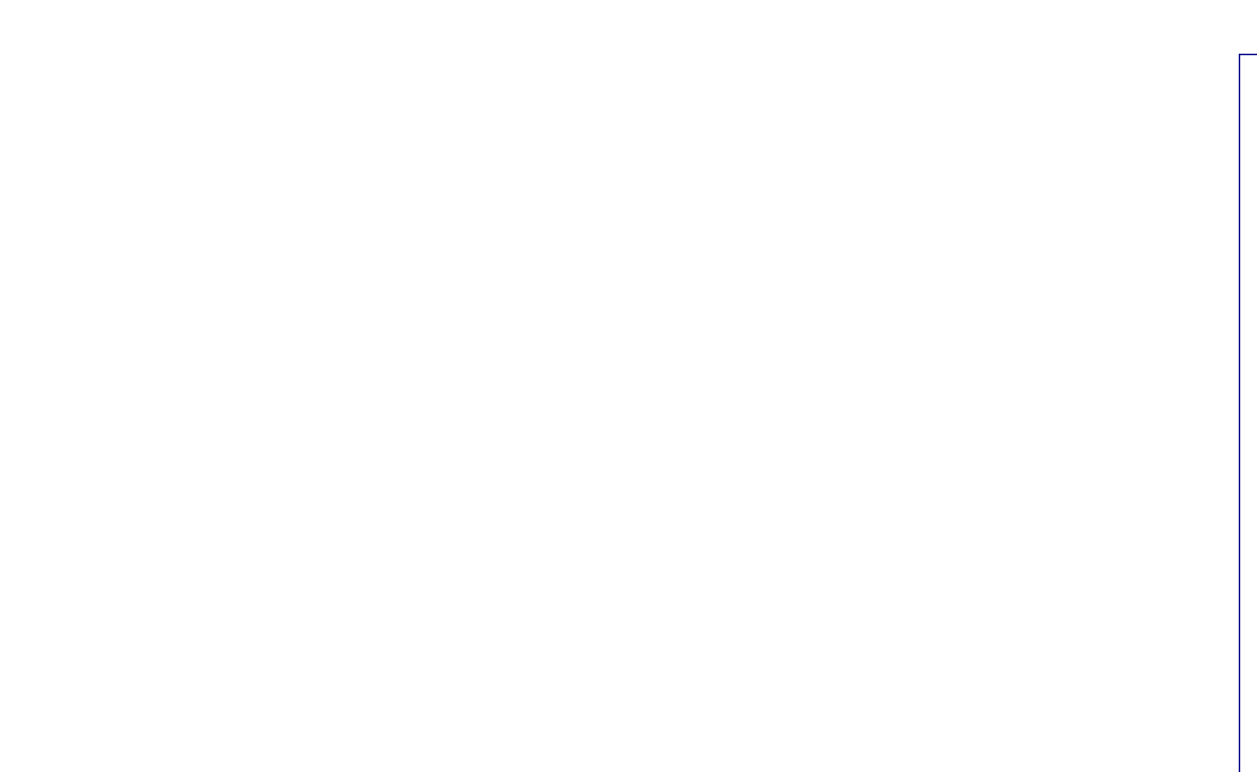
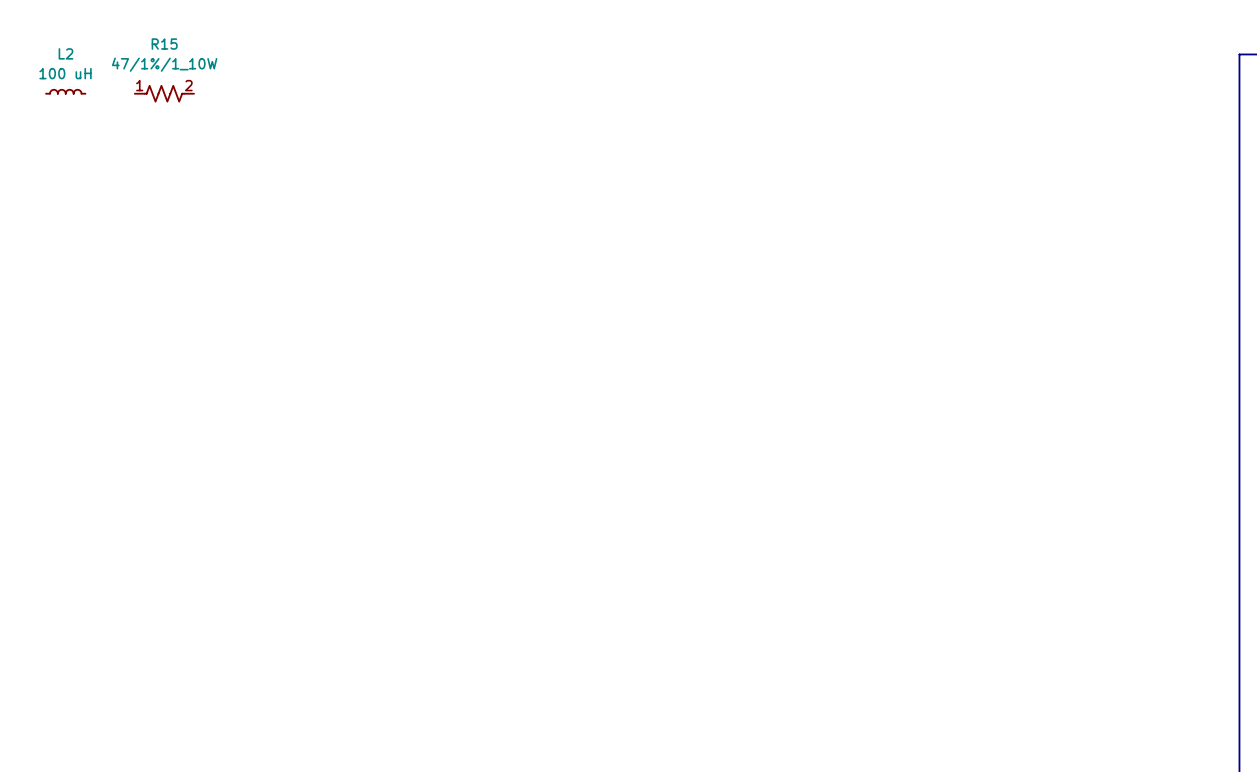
L2: none -> 100 uH (65, 91)
R15: none -> 47/1%/1_10W (164, 93)

